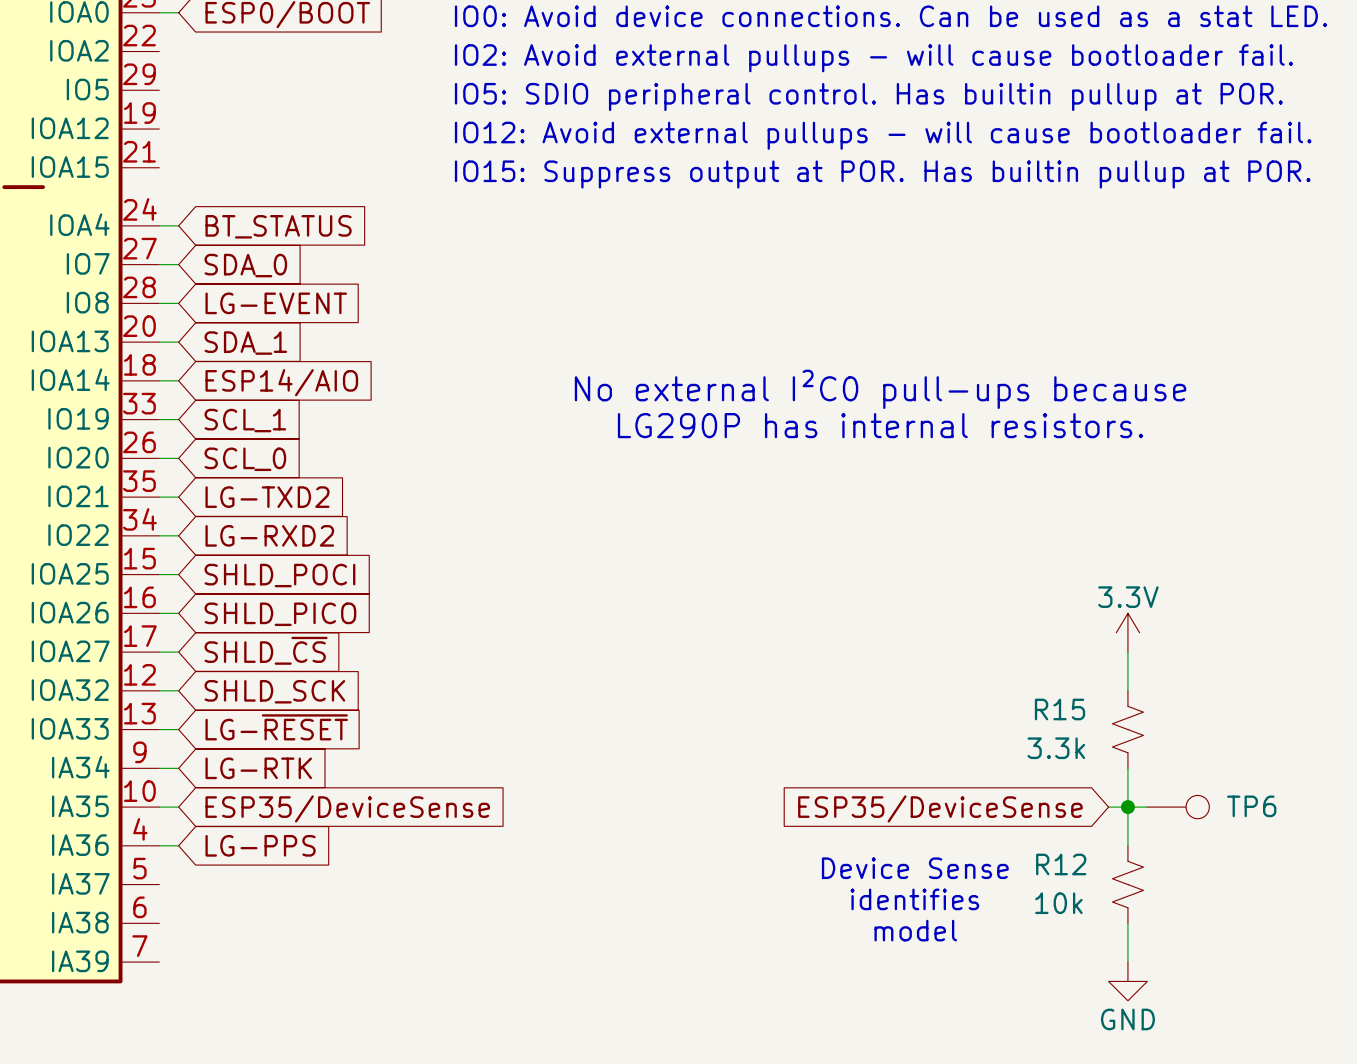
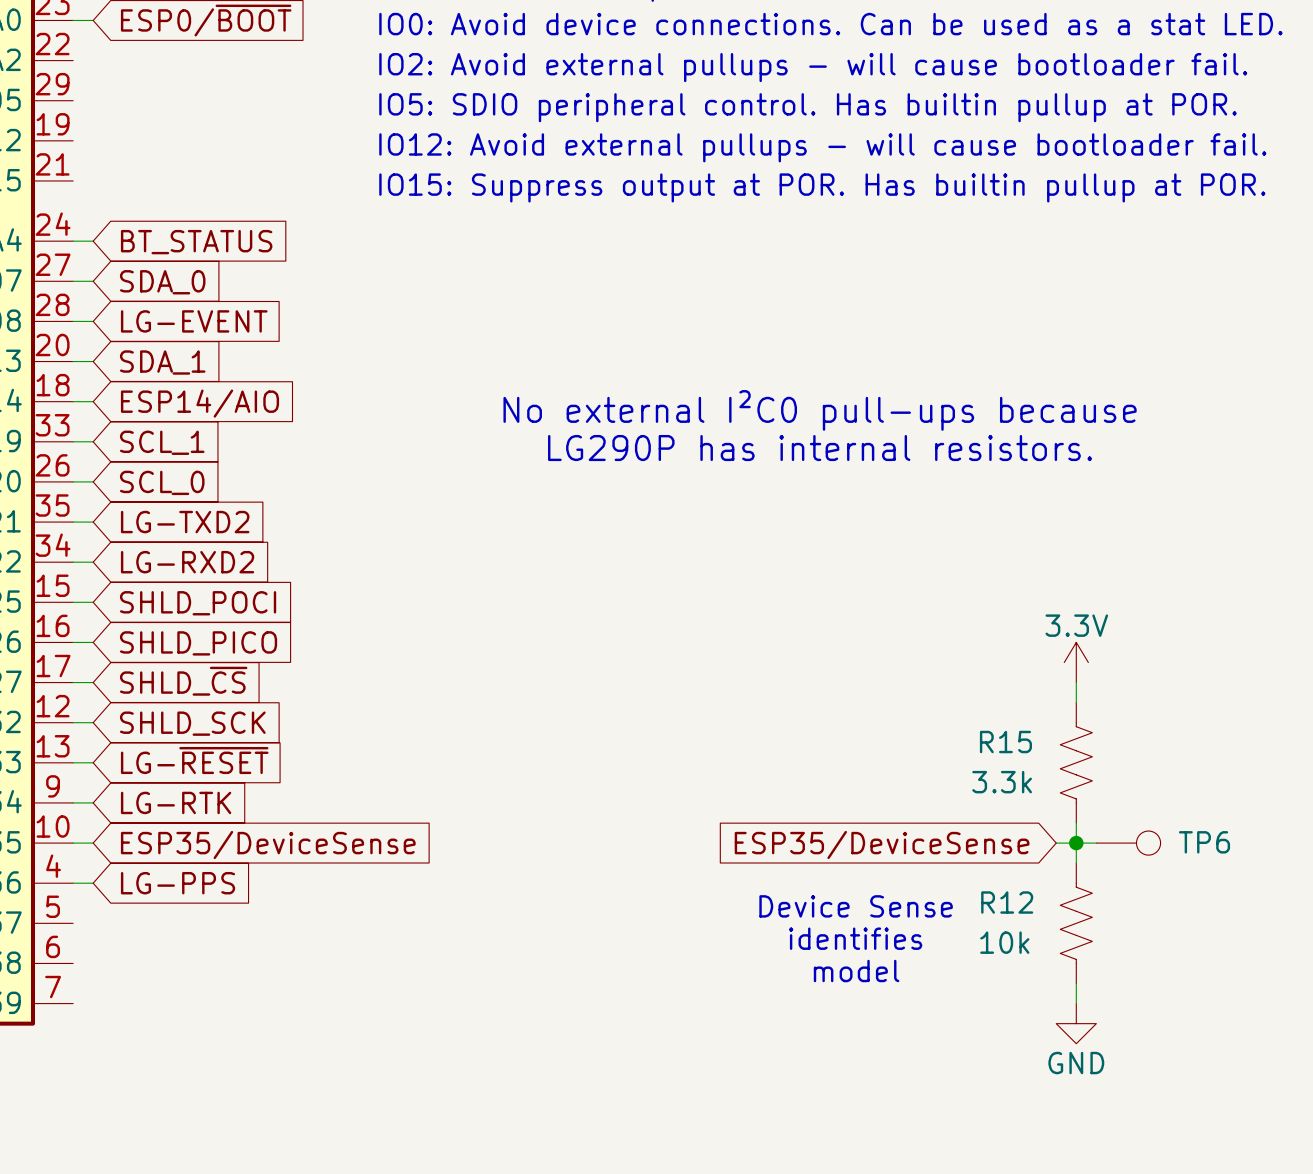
R15 symbol: [1112, 690, 1144, 769] -> [1060, 702, 1093, 824]
R12 symbol: [1112, 845, 1144, 924] -> [1060, 863, 1093, 984]

